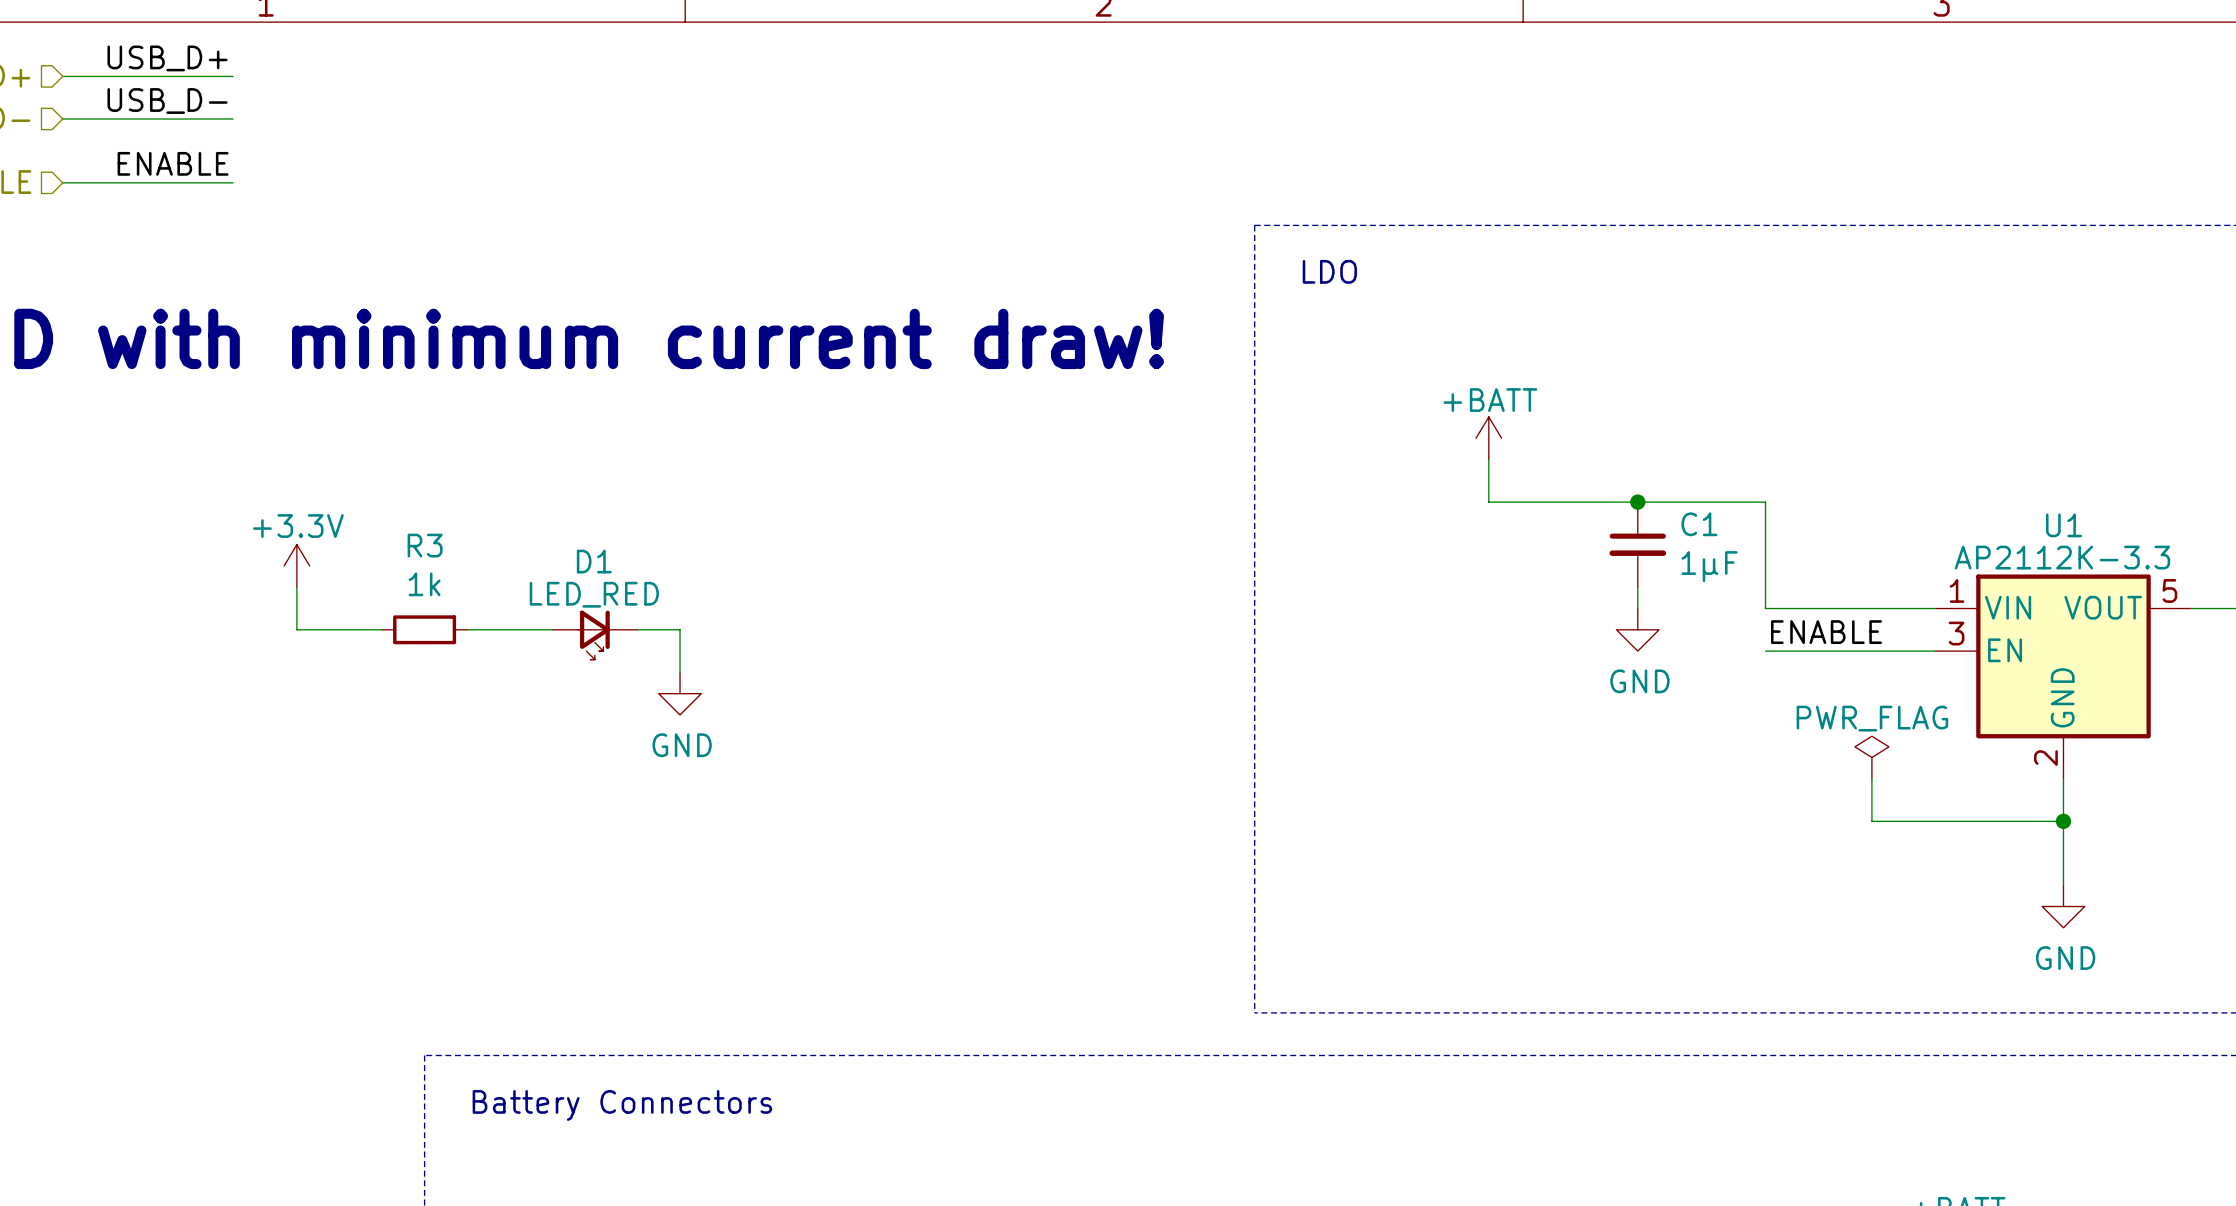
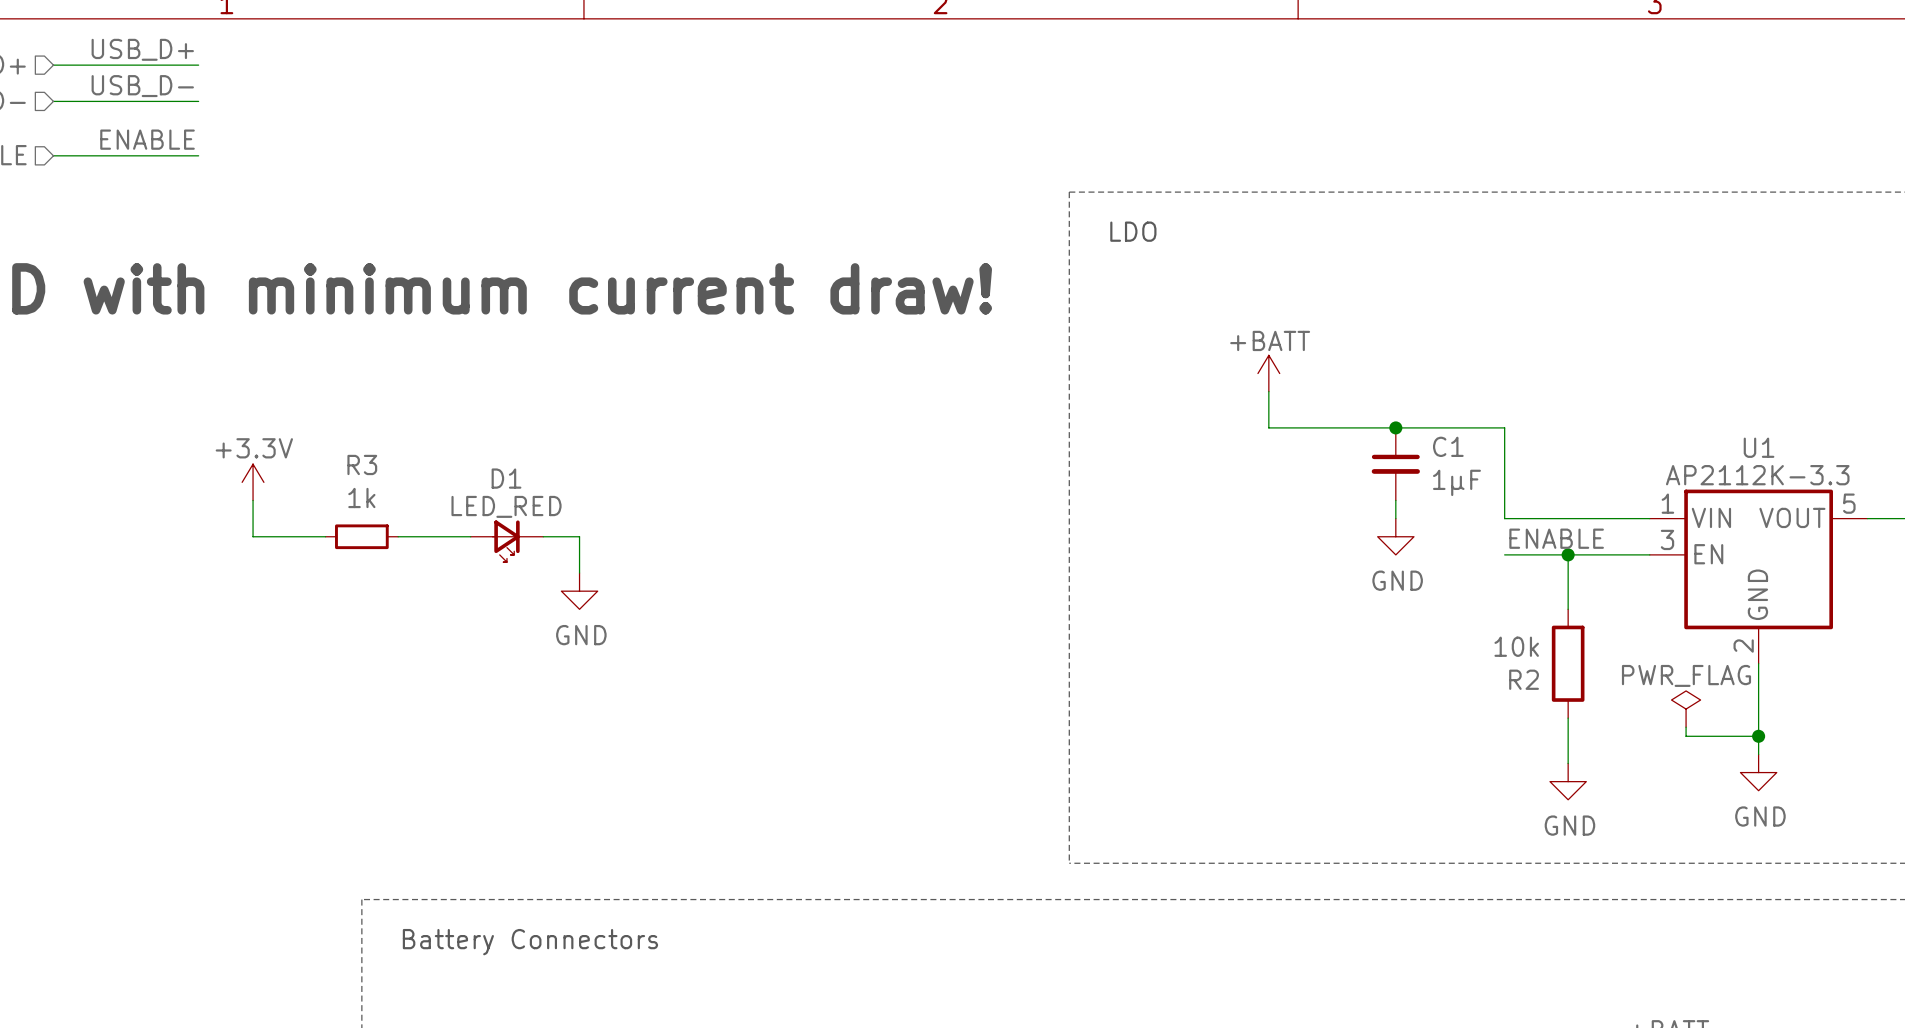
wire: none -> (1568, 554) (1568, 609)
junction: none -> (1568, 554)
power symbol position: PWR_FLAG (1871, 757) -> PWR_FLAG (1686, 709)
R2: none -> 10k (1568, 663)
wire: (1871, 778) (1871, 821) (2063, 821) -> none
junction position: (2063, 821) -> (1758, 736)
wire: none -> (1568, 718) (1568, 763)
wire: none -> (1686, 727) (1686, 736) (1758, 736)
power symbol: none -> GND (1568, 781)

